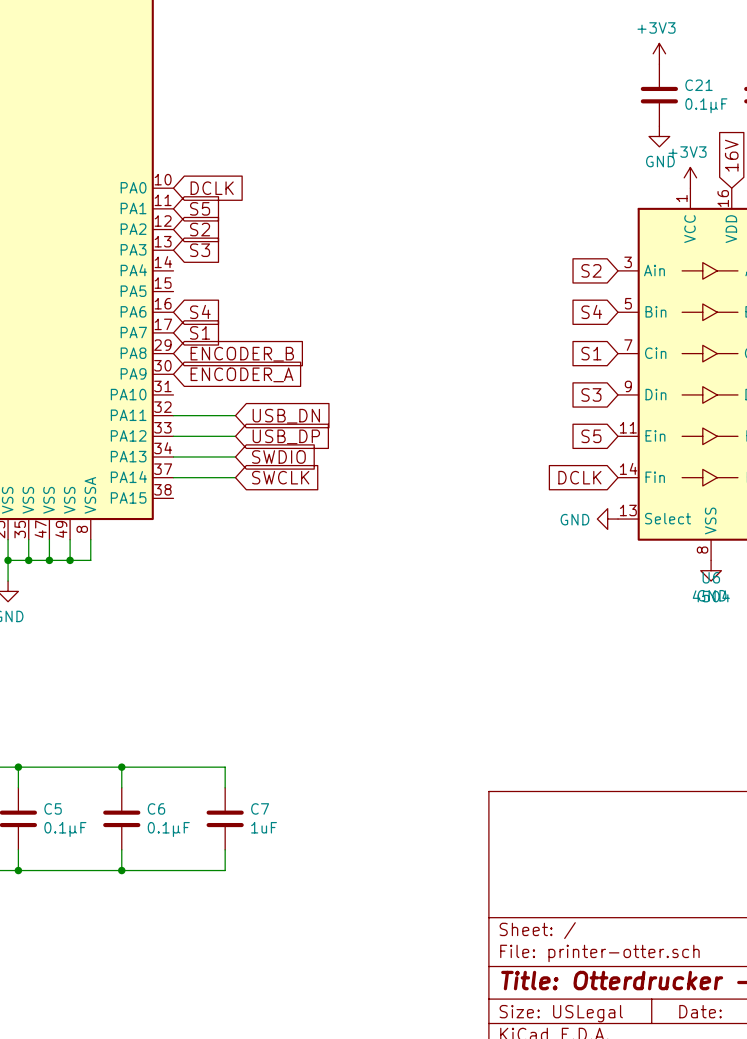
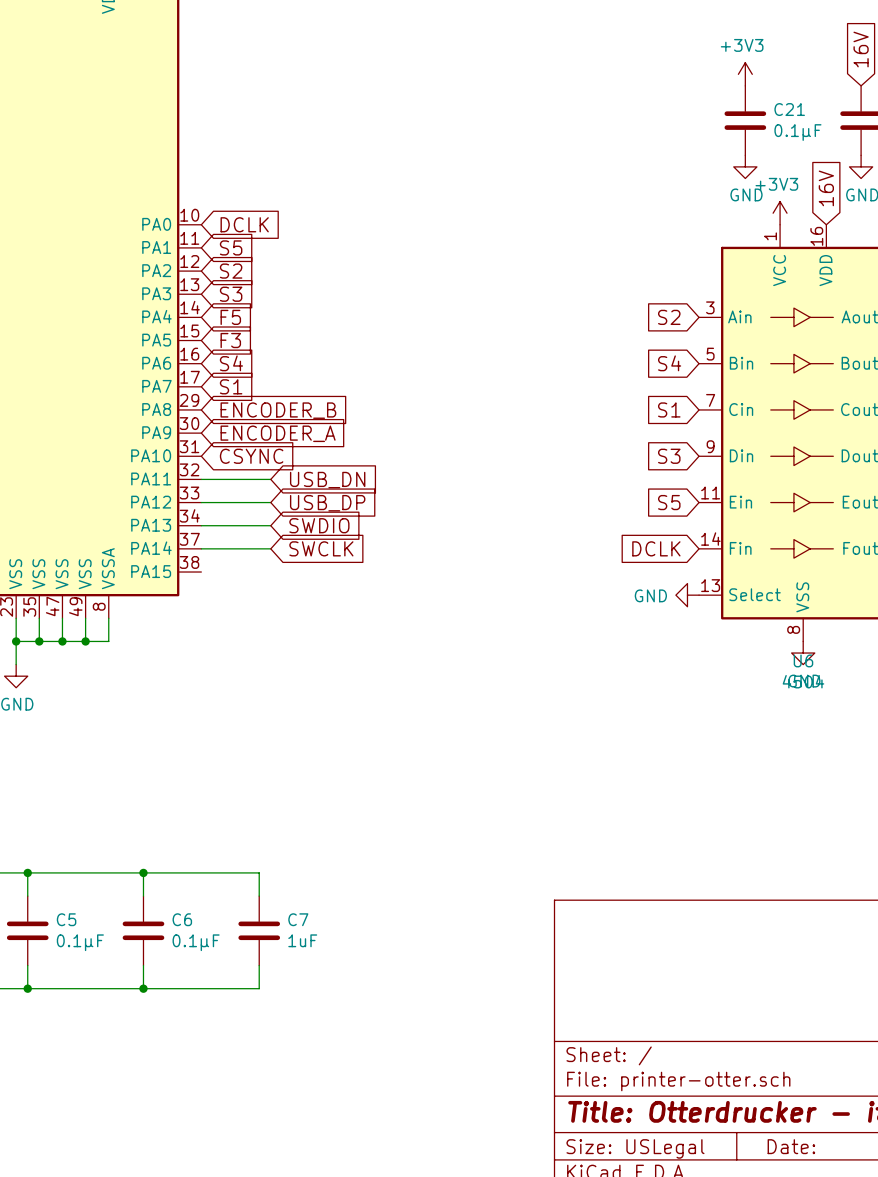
global label: none -> F5 (230, 317)
global label: none -> F3 (230, 340)
global label: none -> CSYNC (251, 456)

